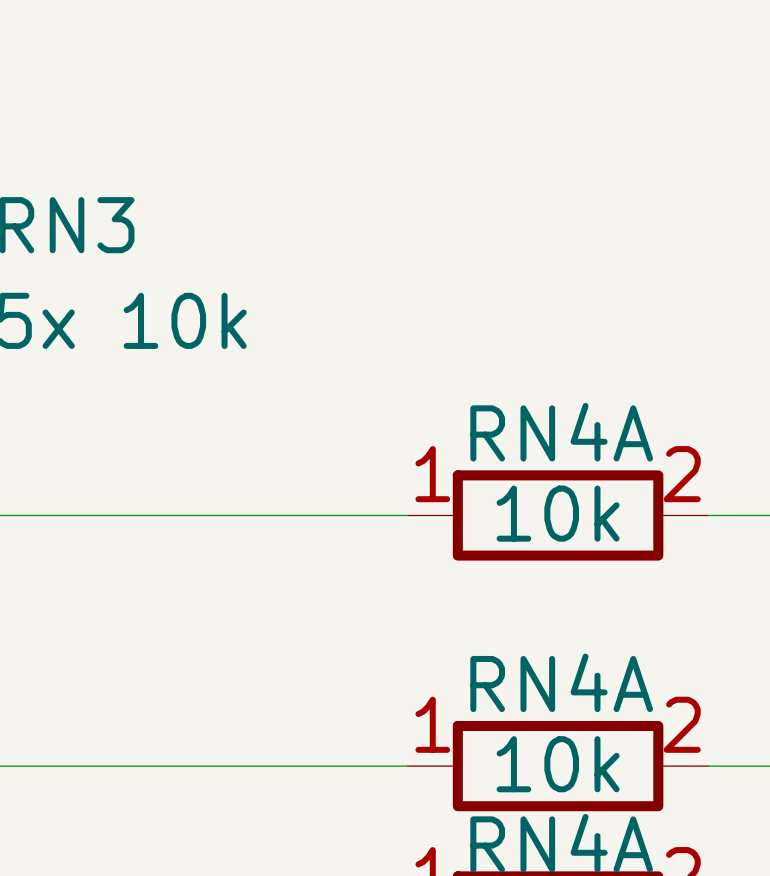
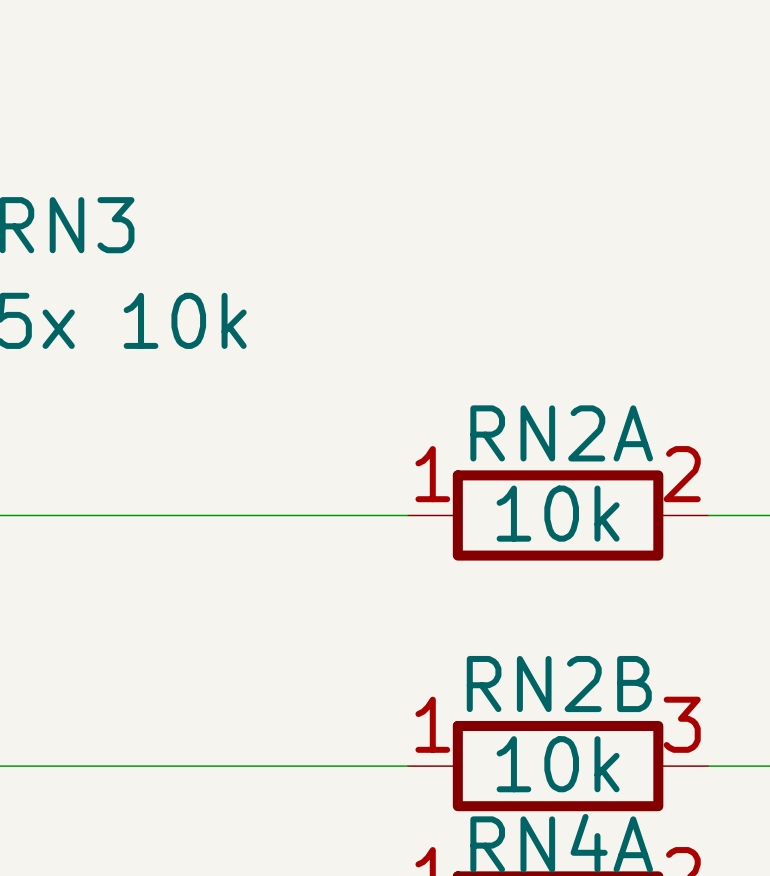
RN4A name: RN4A (561, 432) -> RN2A (561, 433)
RN4A name: RN4A (561, 682) -> RN2B (559, 684)
RN4A pin number: 2 (682, 724) -> 3 (682, 724)

